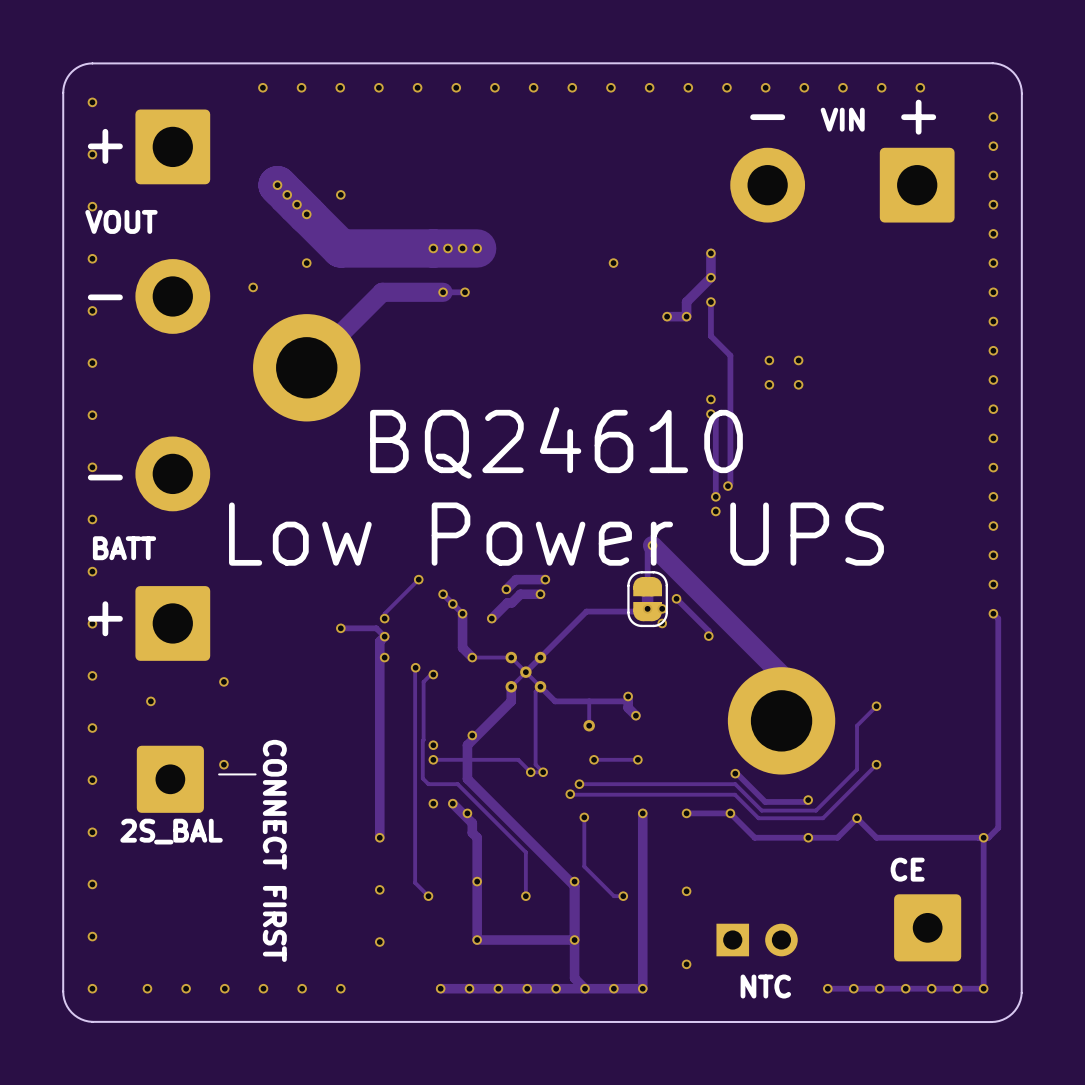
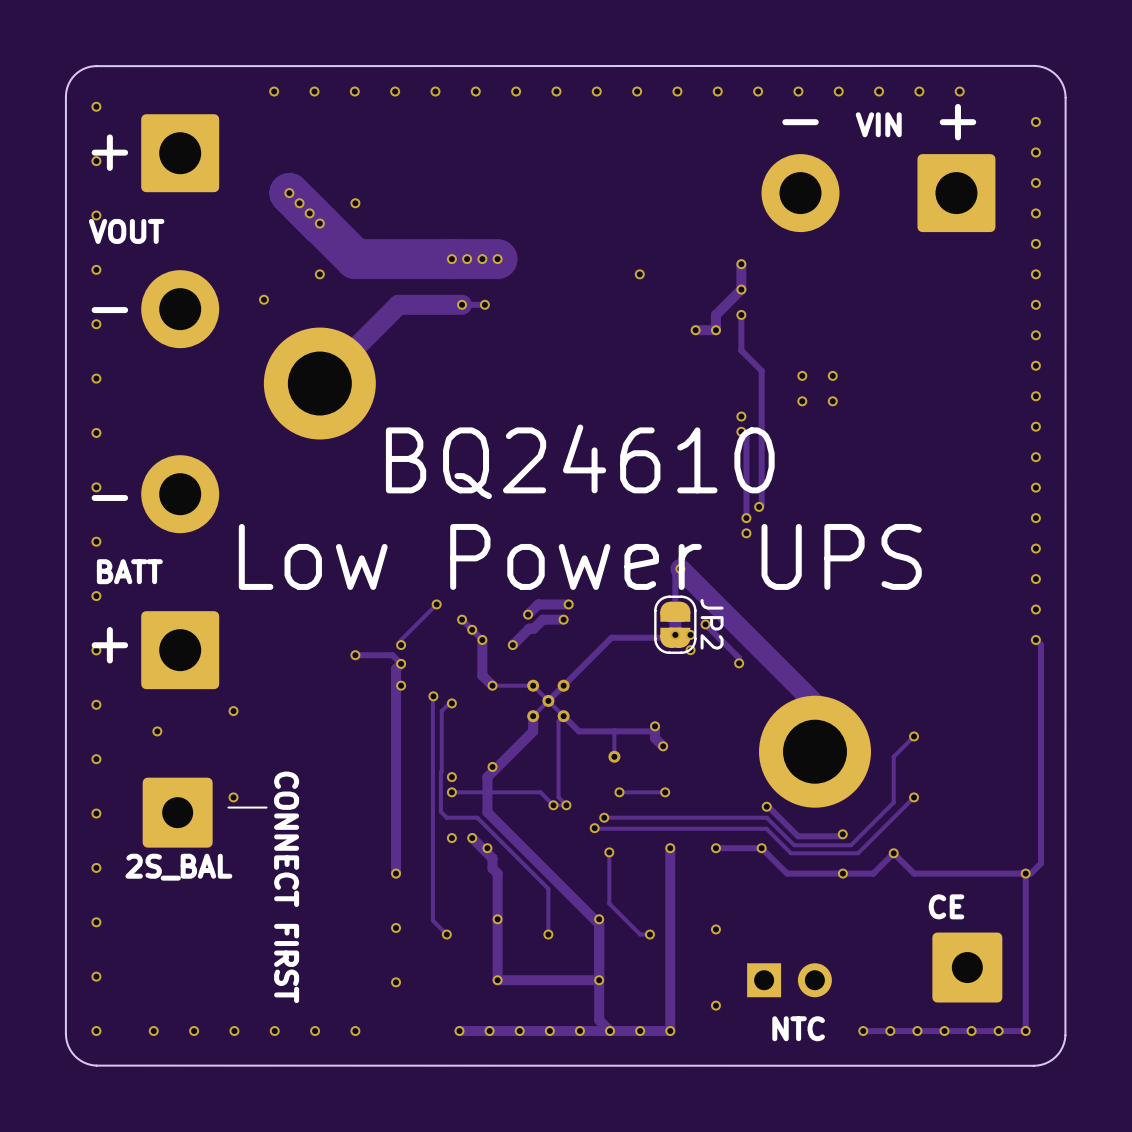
JP2 name: none -> JP2 (712, 624)

